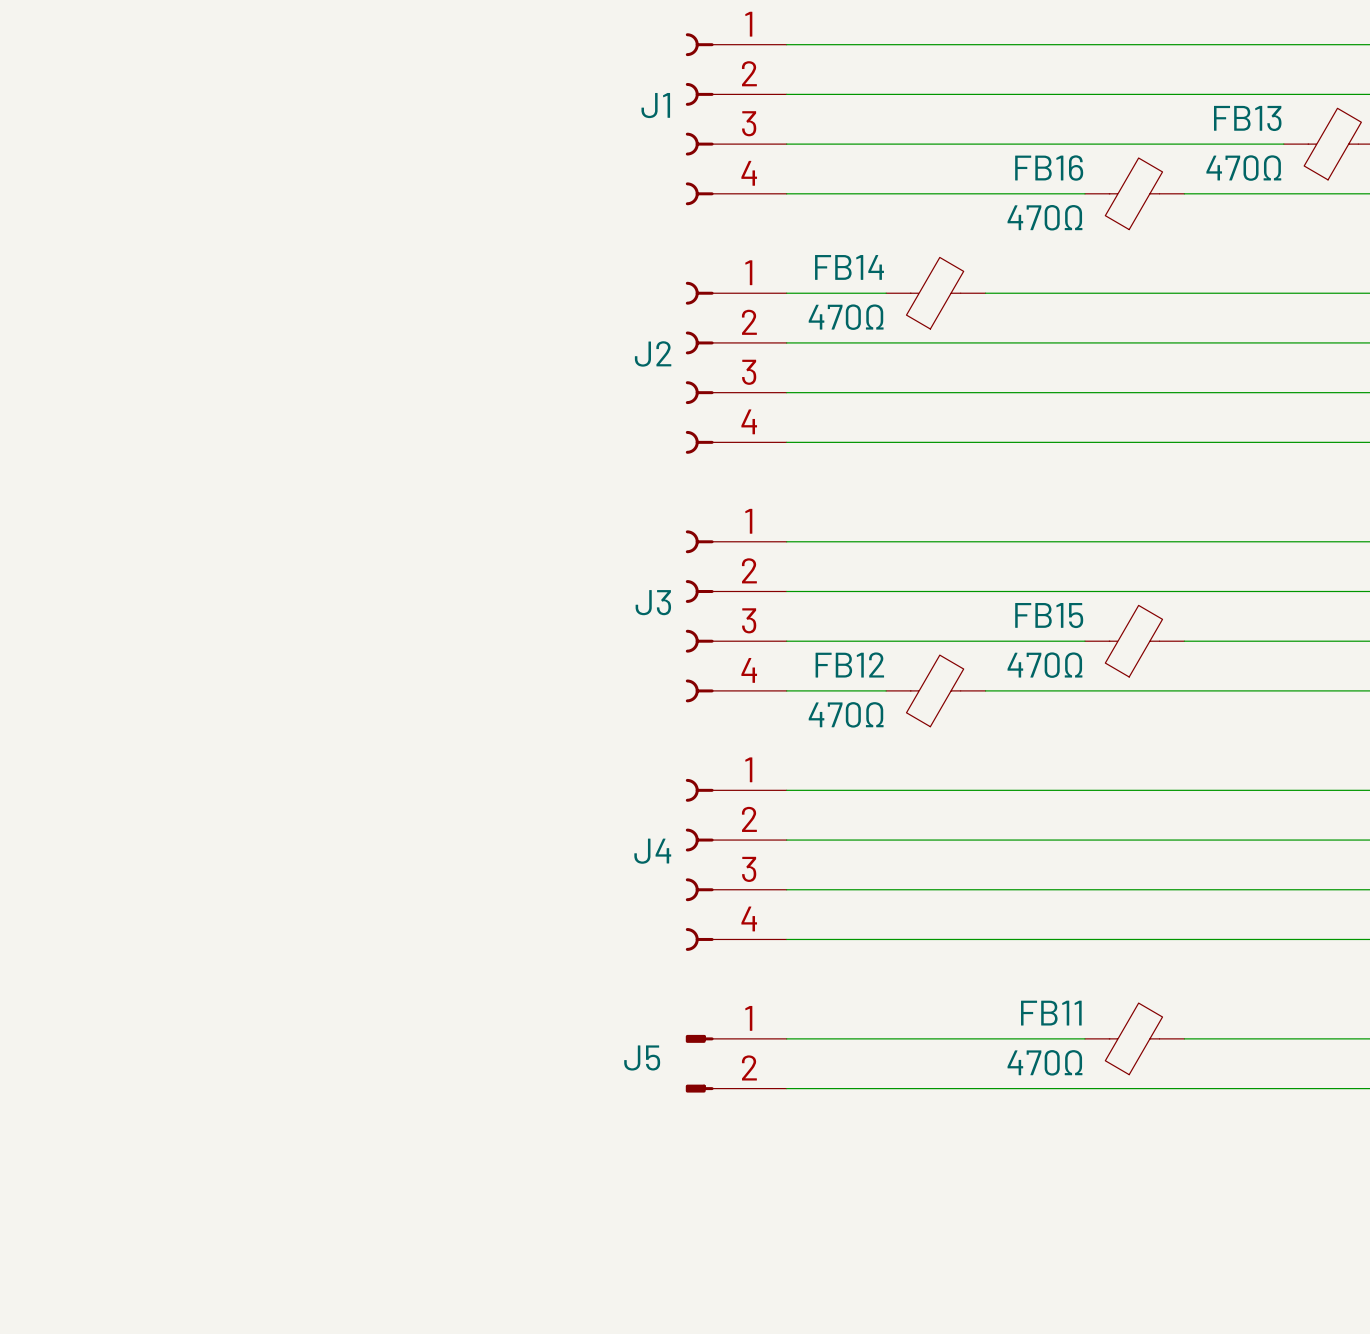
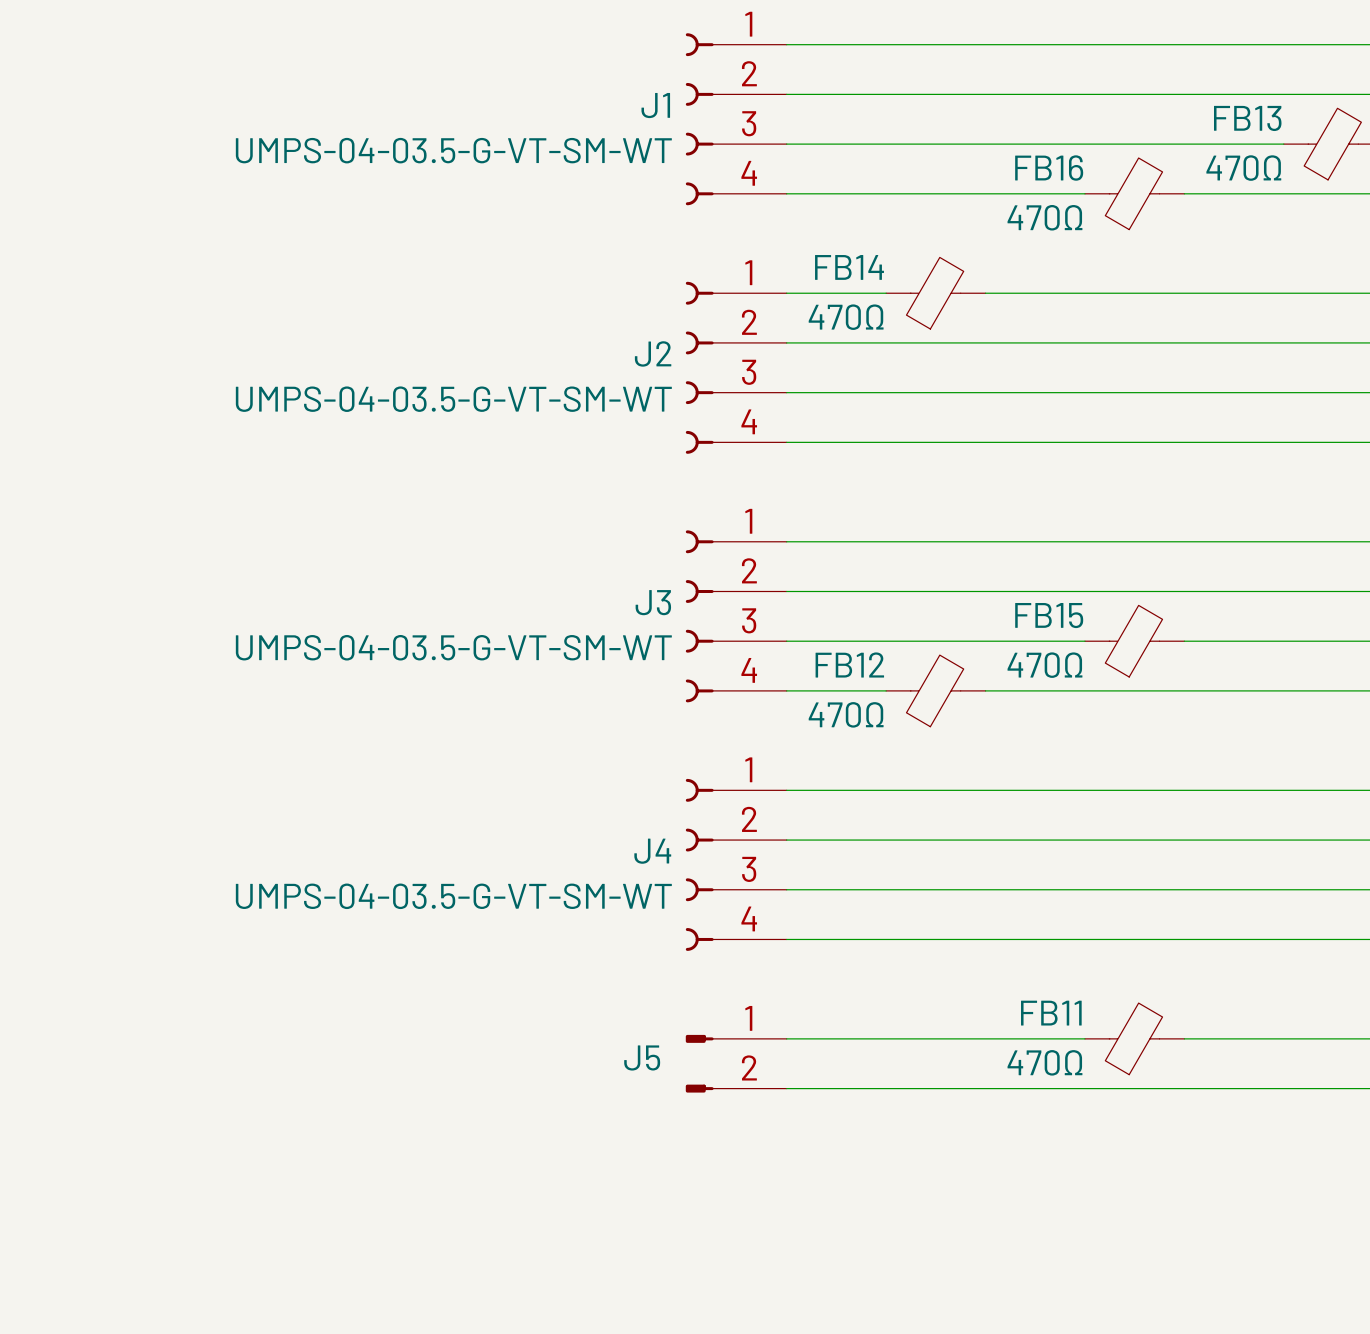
J1 value: none -> UMPS-04-03.5-G-VT-SM-WT (453, 150)
J2 value: none -> UMPS-04-03.5-G-VT-SM-WT (453, 399)
J3 value: none -> UMPS-04-03.5-G-VT-SM-WT (453, 647)
J4 value: none -> UMPS-04-03.5-G-VT-SM-WT (453, 896)

